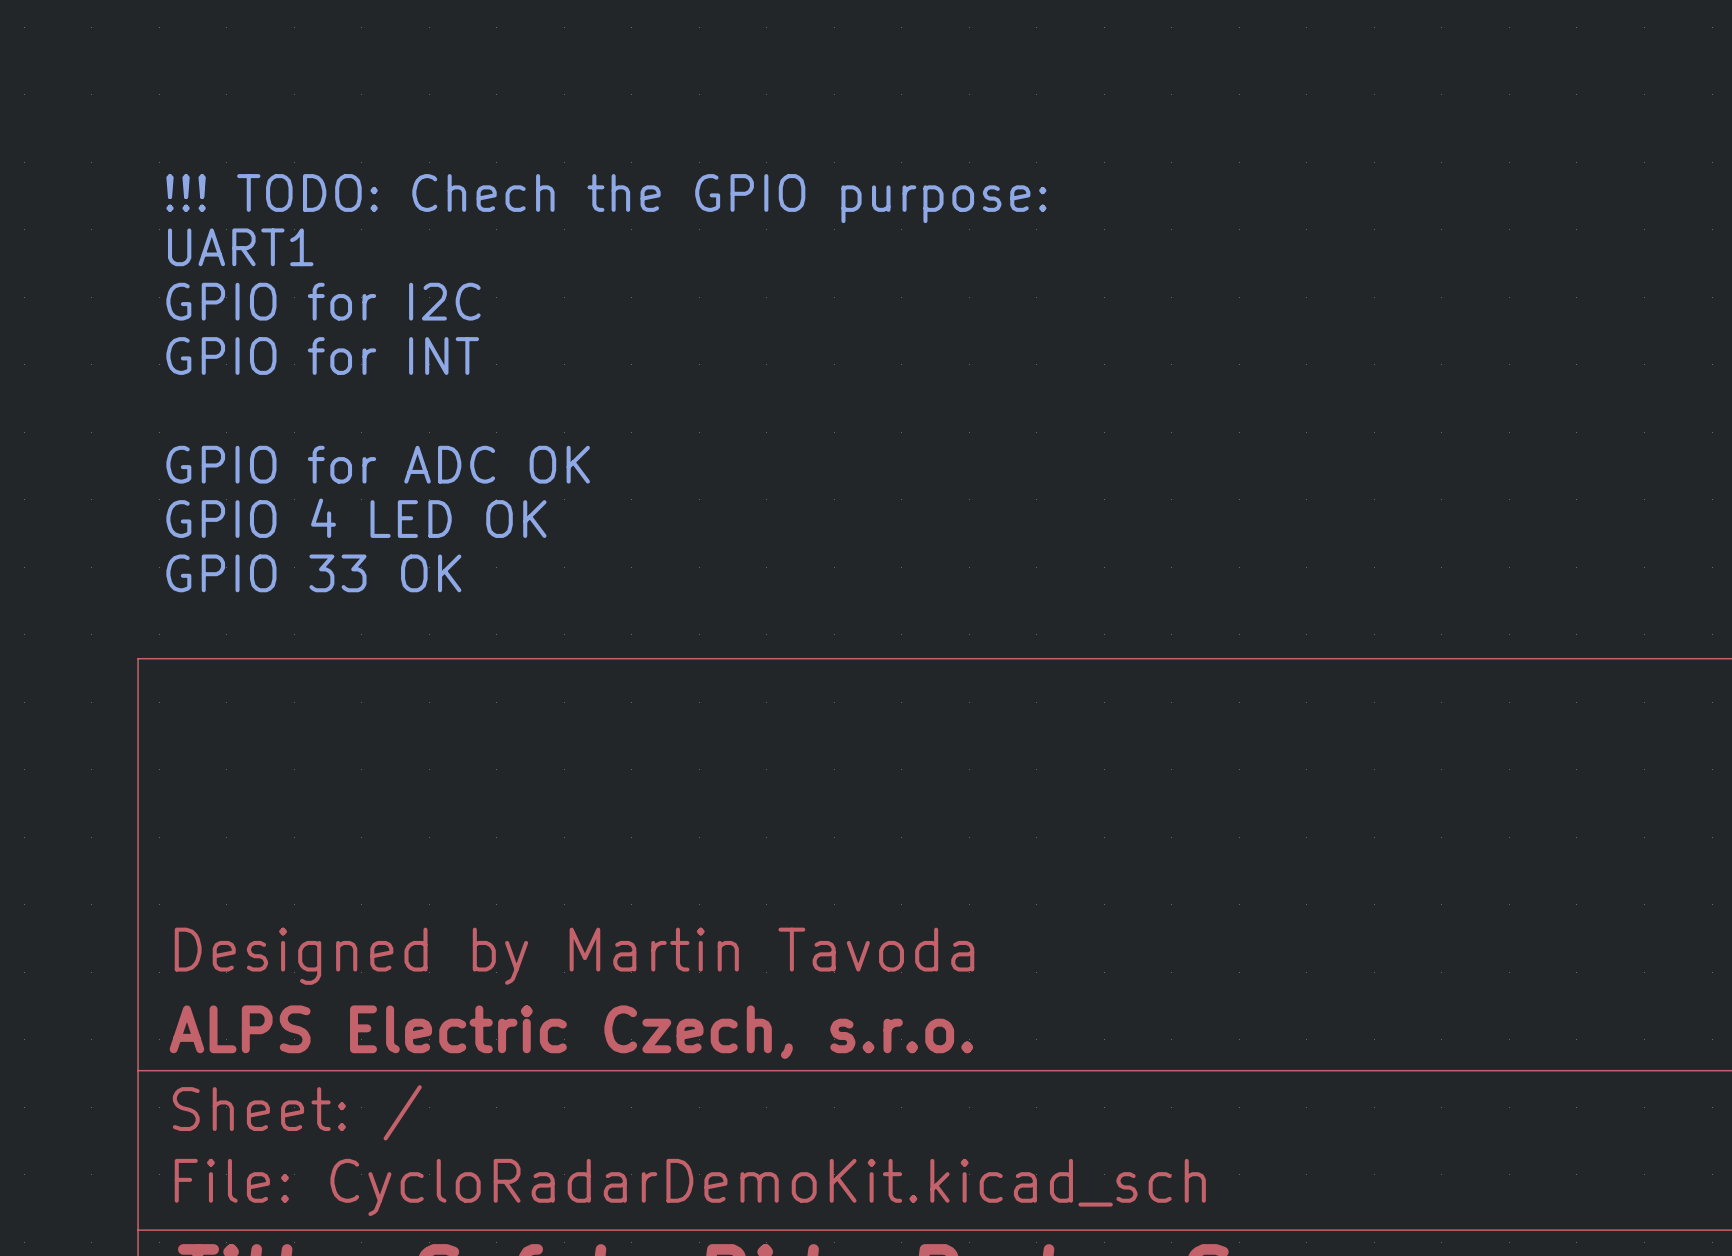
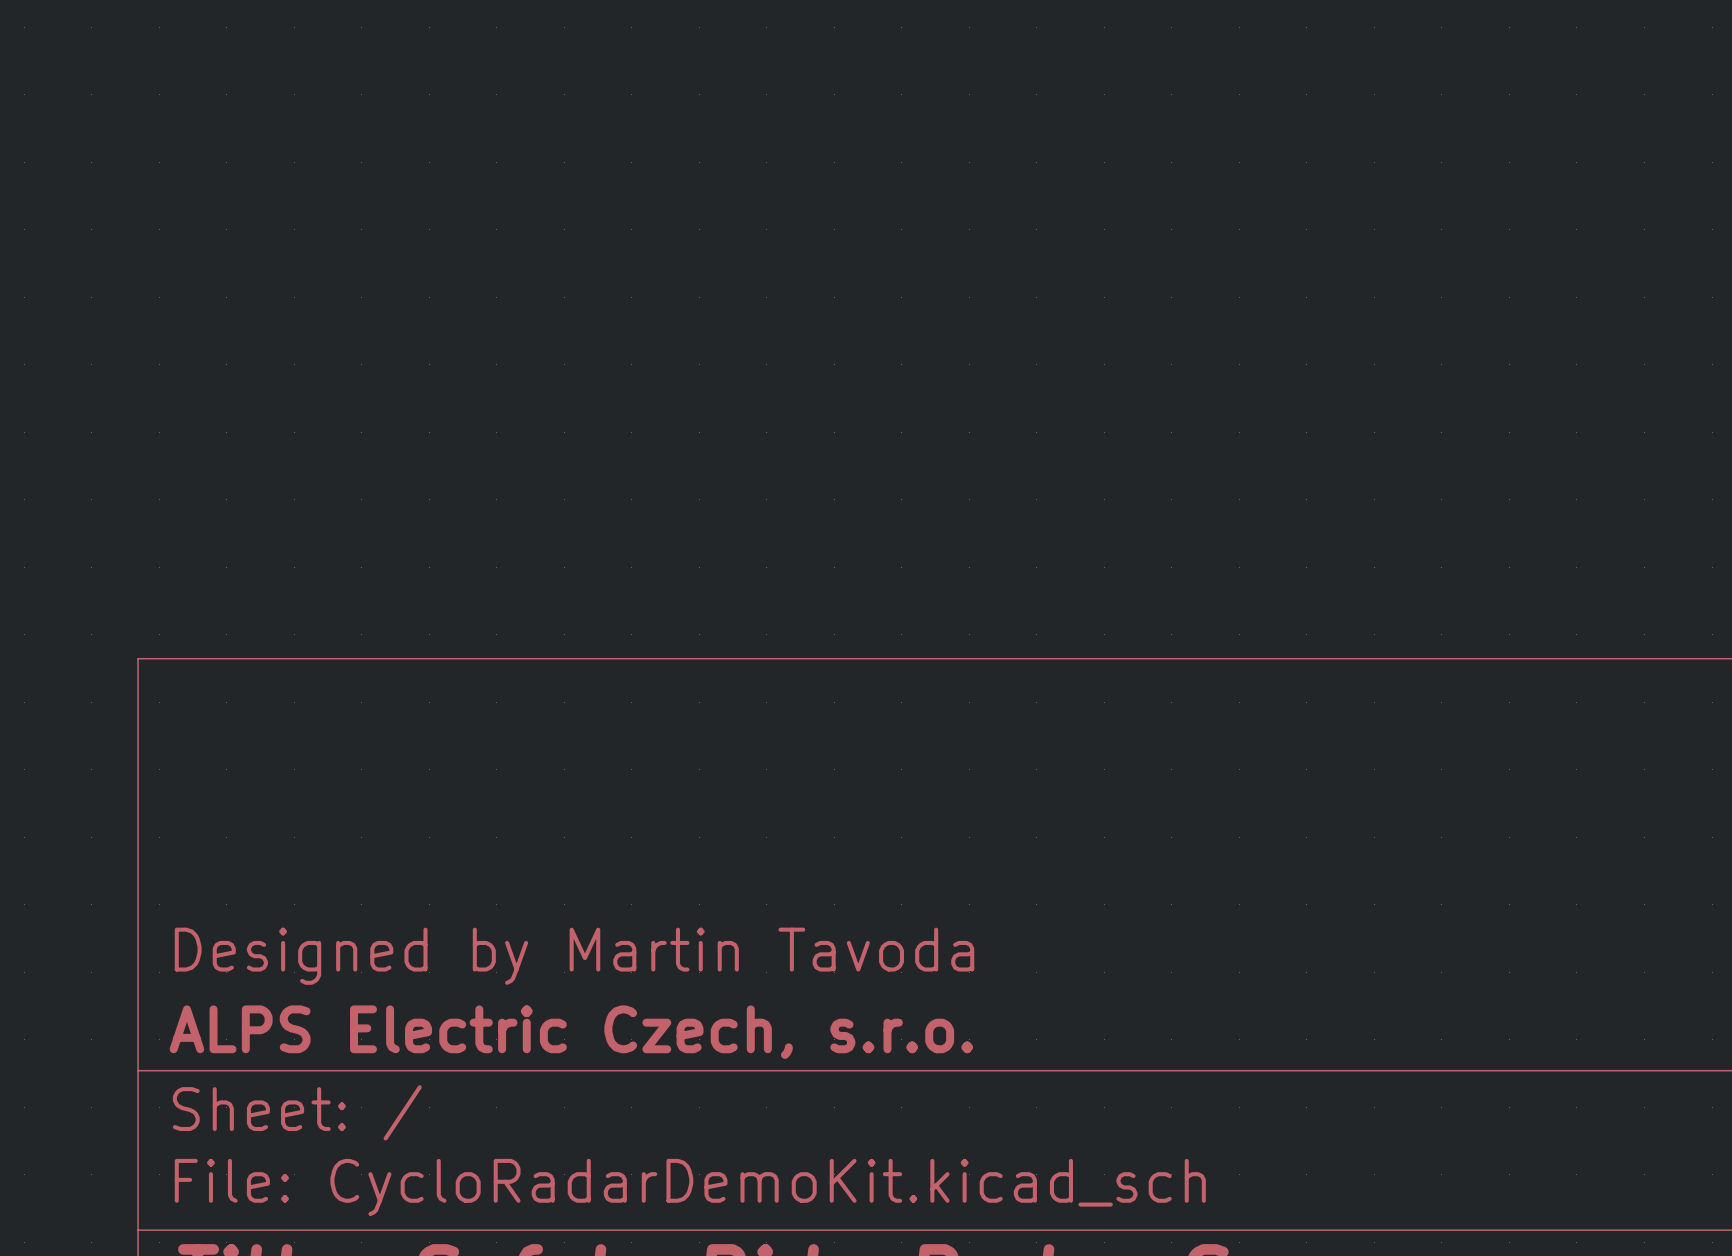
text: !!! TODO: Chech the GPIO purpose: (606, 198) -> none
text: UART1 (240, 247) -> none
text: GPIO for I2C (323, 301) -> none
text: GPIO for INT (322, 356) -> none
text: GPIO for ADC OK (378, 464) -> none
text: GPIO 4 LED OK (356, 518) -> none
text: GPIO 33 OK (313, 573) -> none

